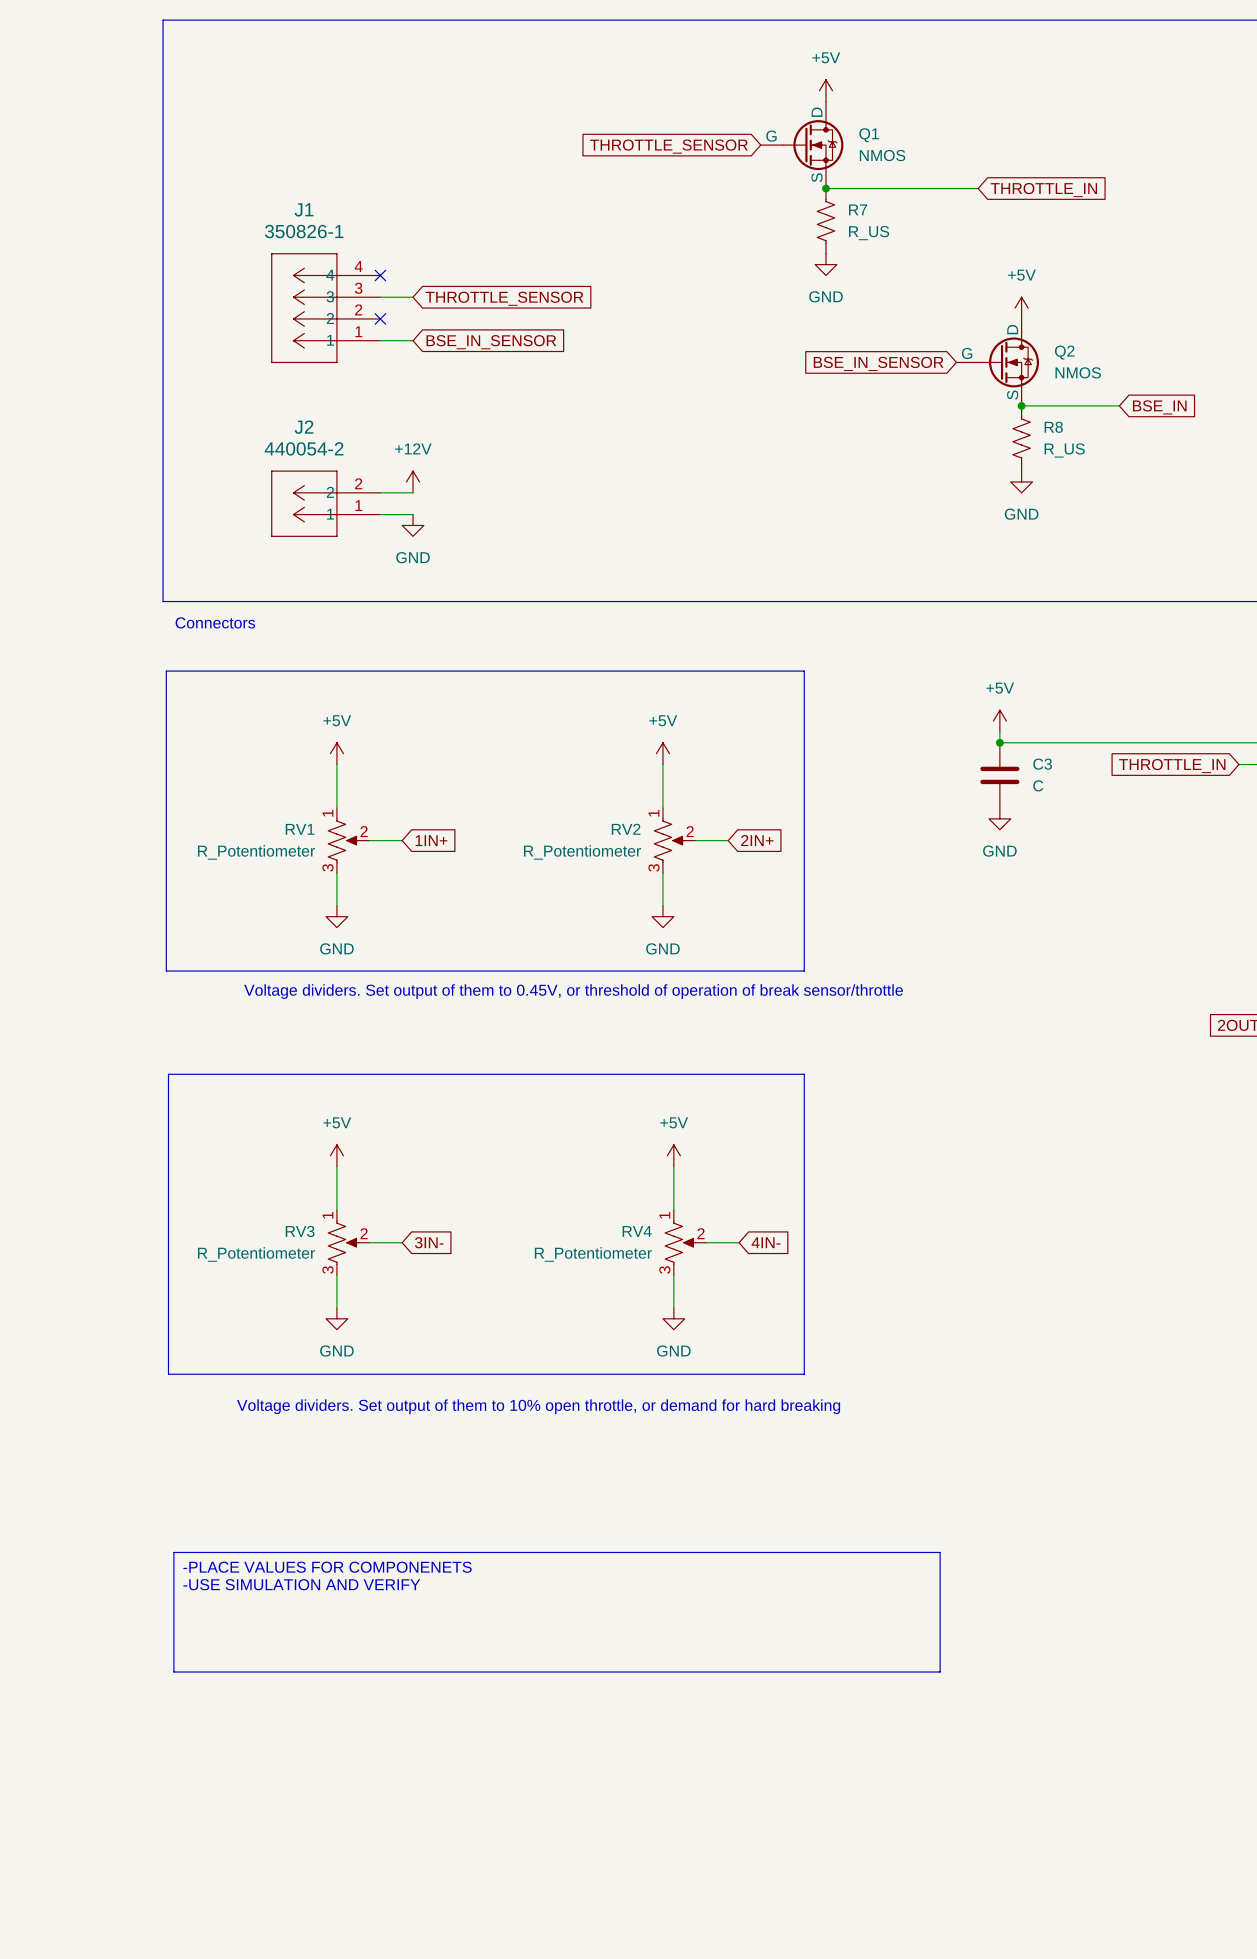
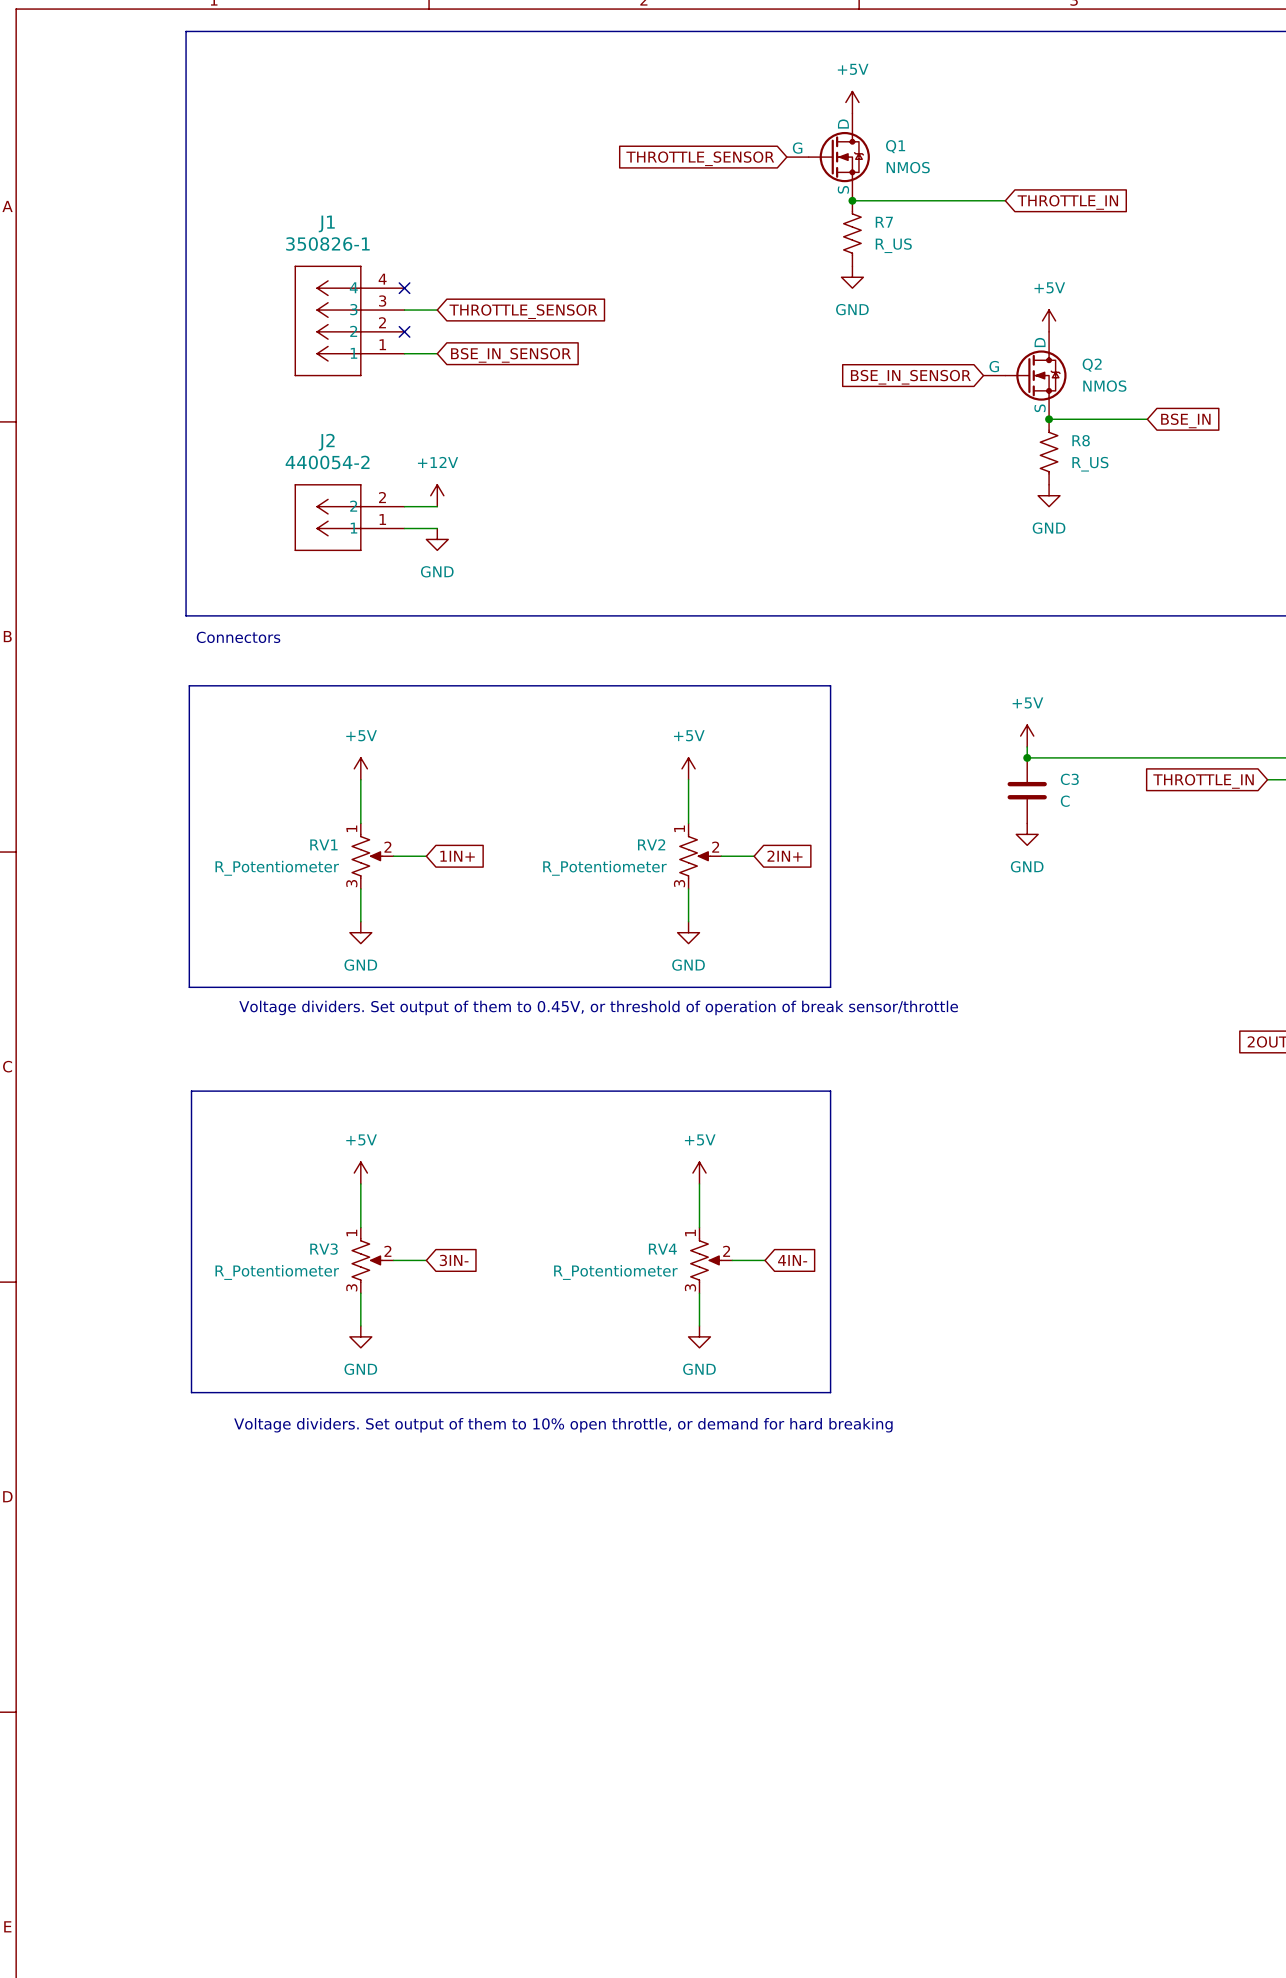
line: (173, 1552) (940, 1552) (940, 1672) (173, 1672) (173, 1552) -> none
text: -PLACE VALUES FOR COMPONENETS (327, 1567) -> none
text: -USE SIMULATION AND VERIFY (301, 1584) -> none

